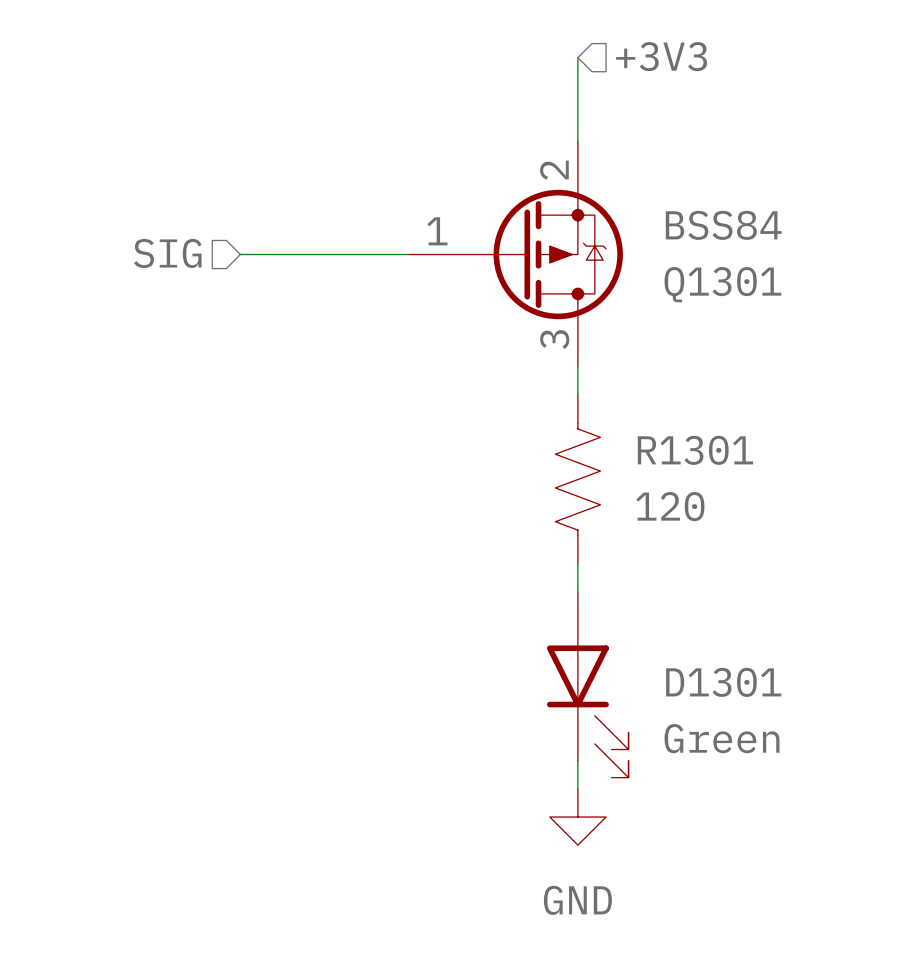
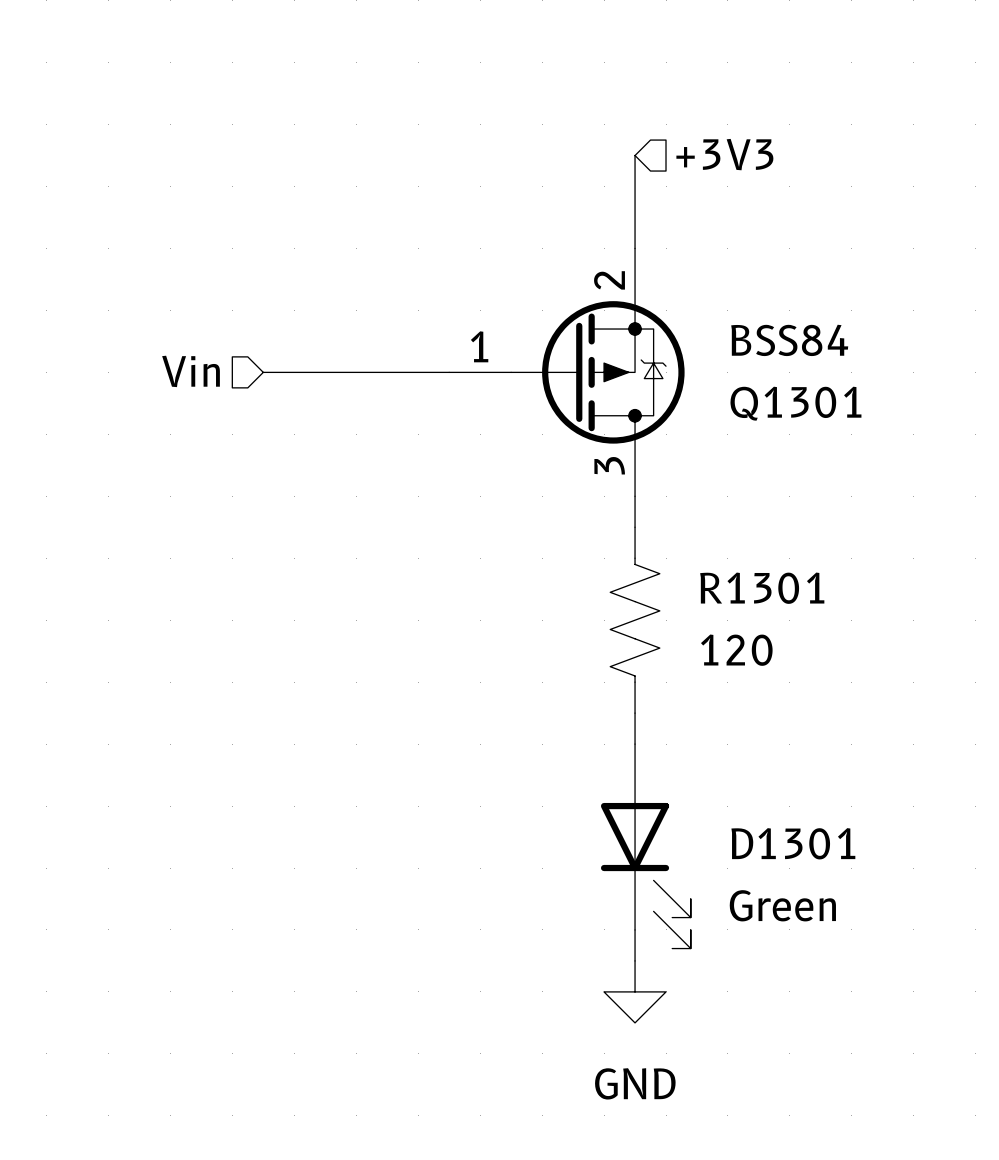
hierarchical label: SIG (167, 253) -> Vin (191, 371)

